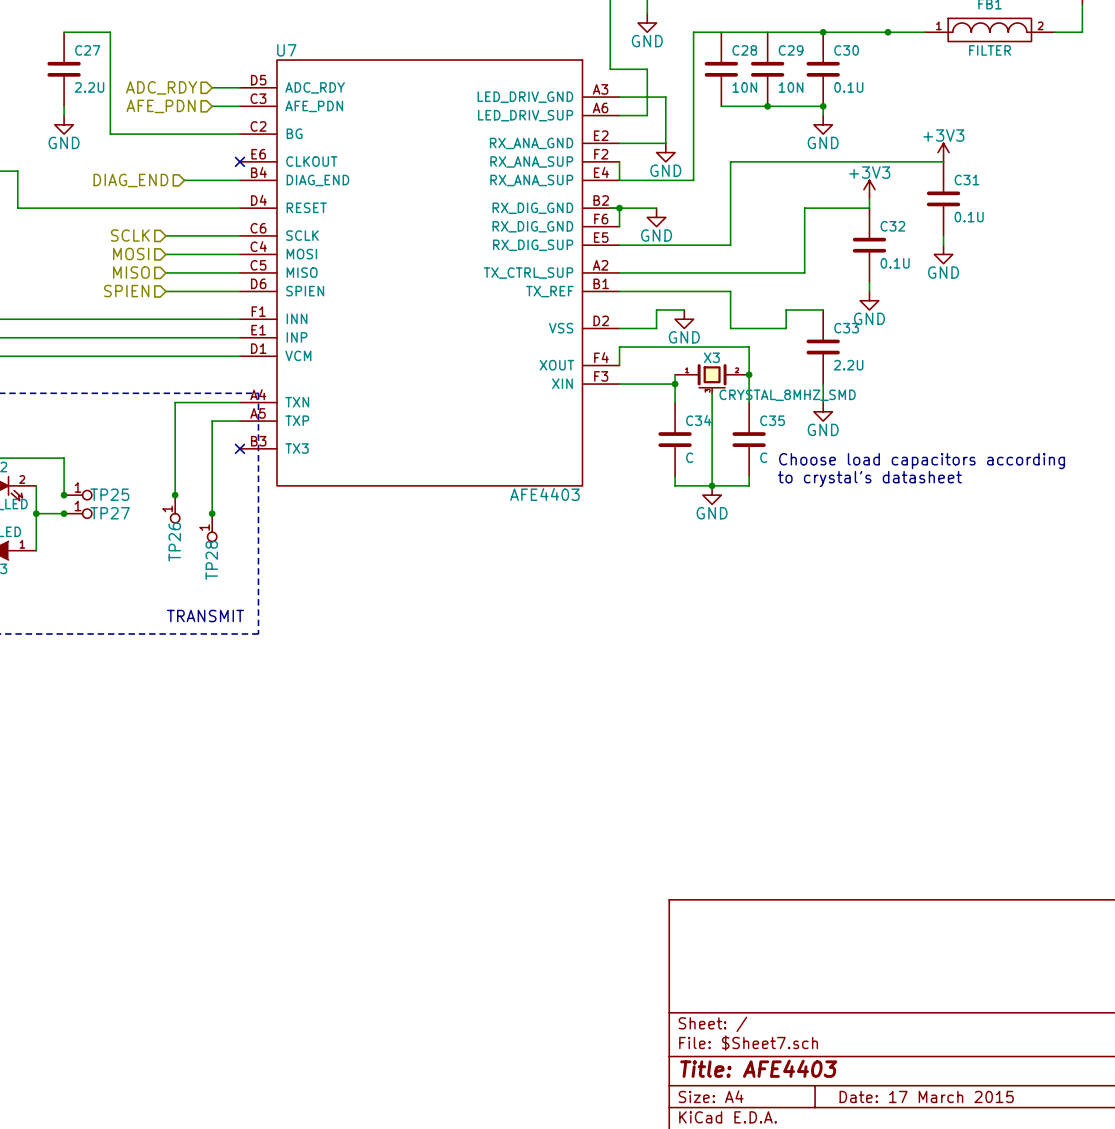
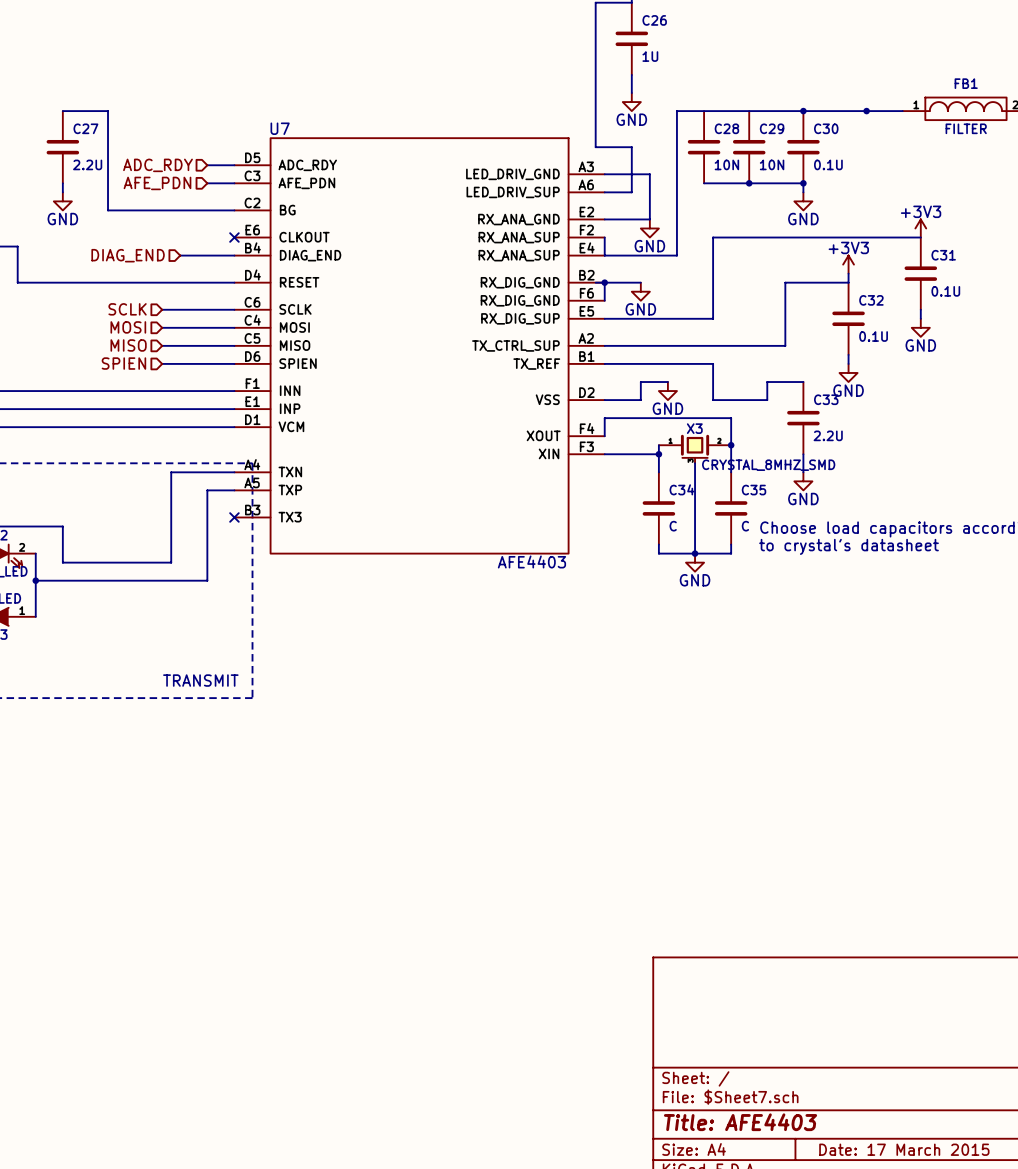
wire: none -> (62, 562) (171, 562)
junction: (64, 495) -> none
TP25: (77, 495) -> none
junction: (175, 495) -> none
TP26: (175, 509) -> none
wire: none -> (62, 580) (207, 580)
junction: (64, 513) -> none
TP27: (77, 513) -> none
junction: (212, 513) -> none
TP28: (212, 527) -> none

